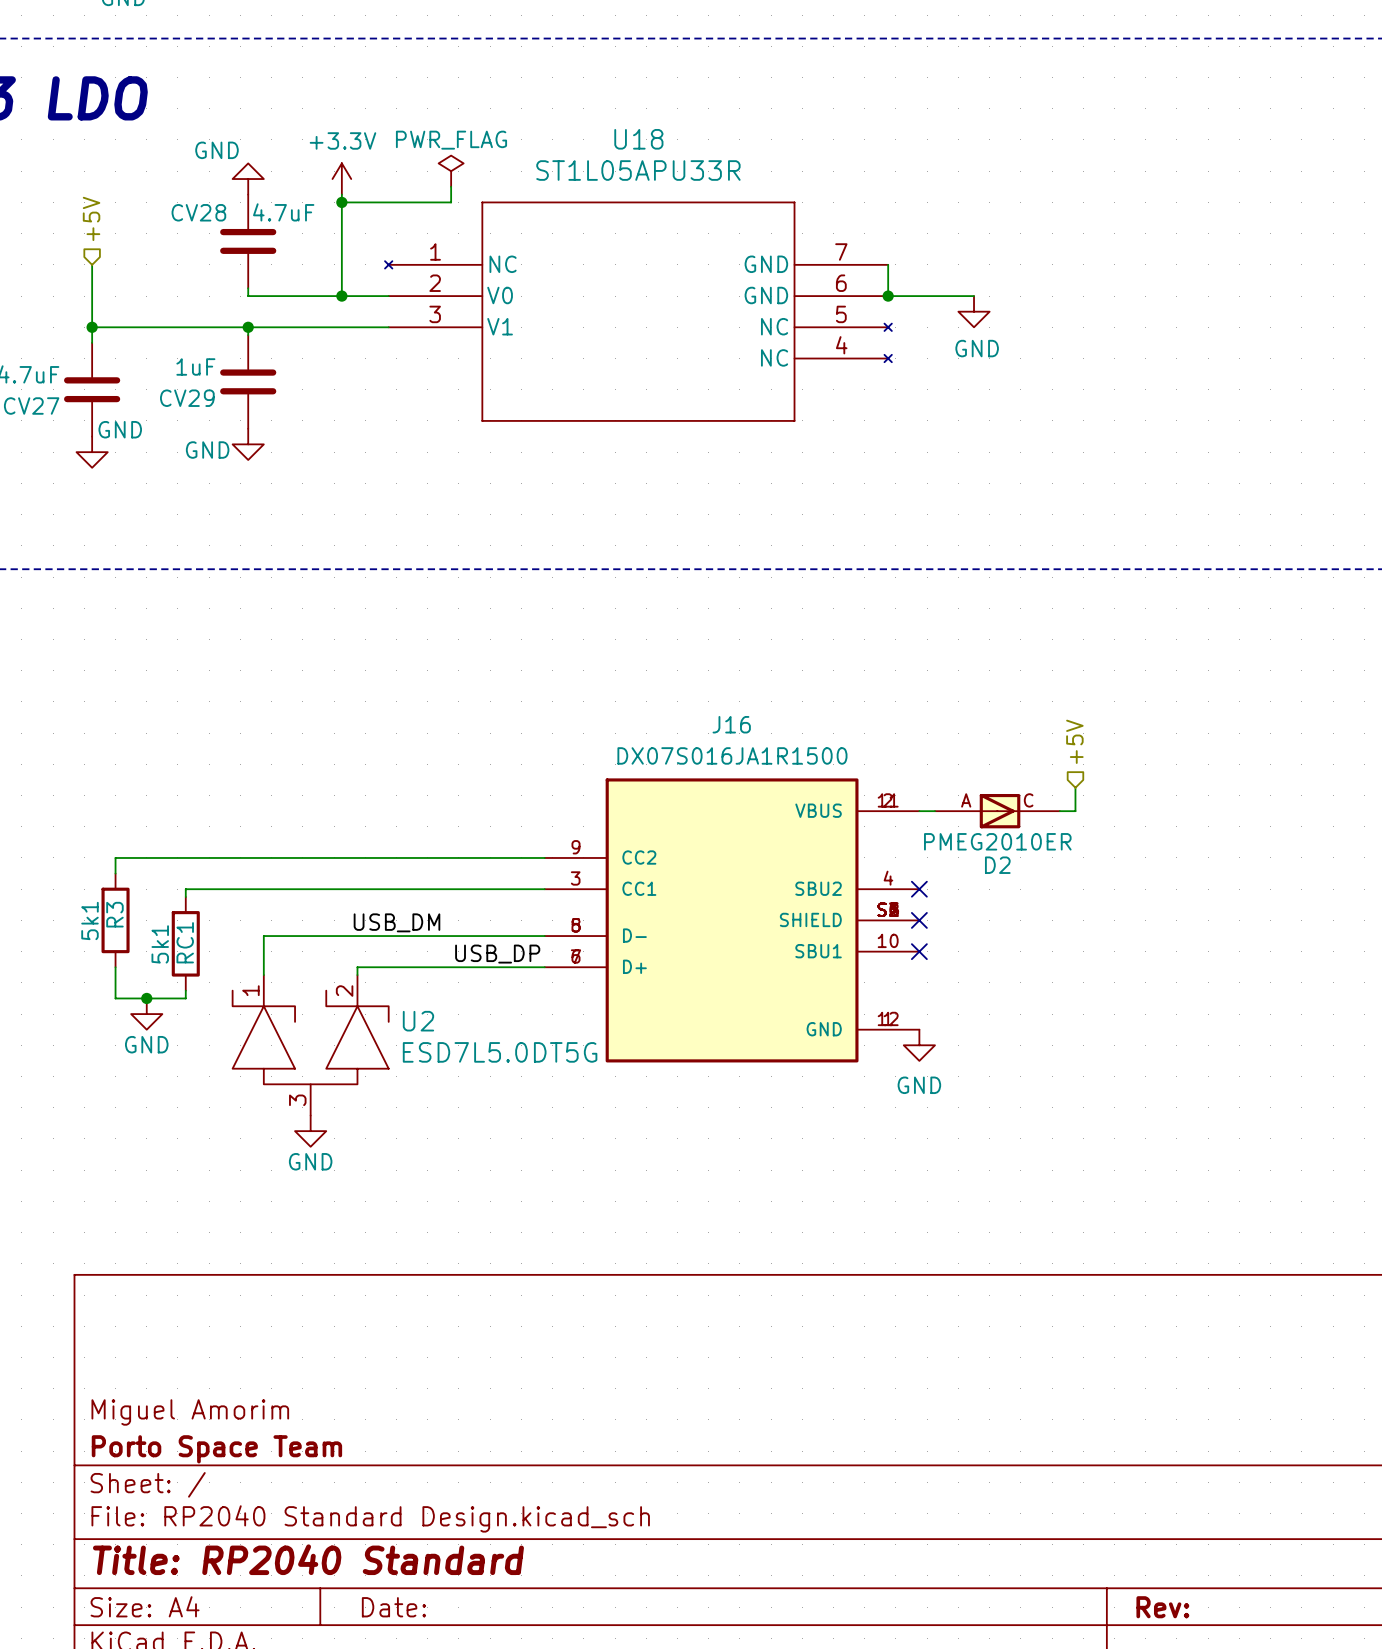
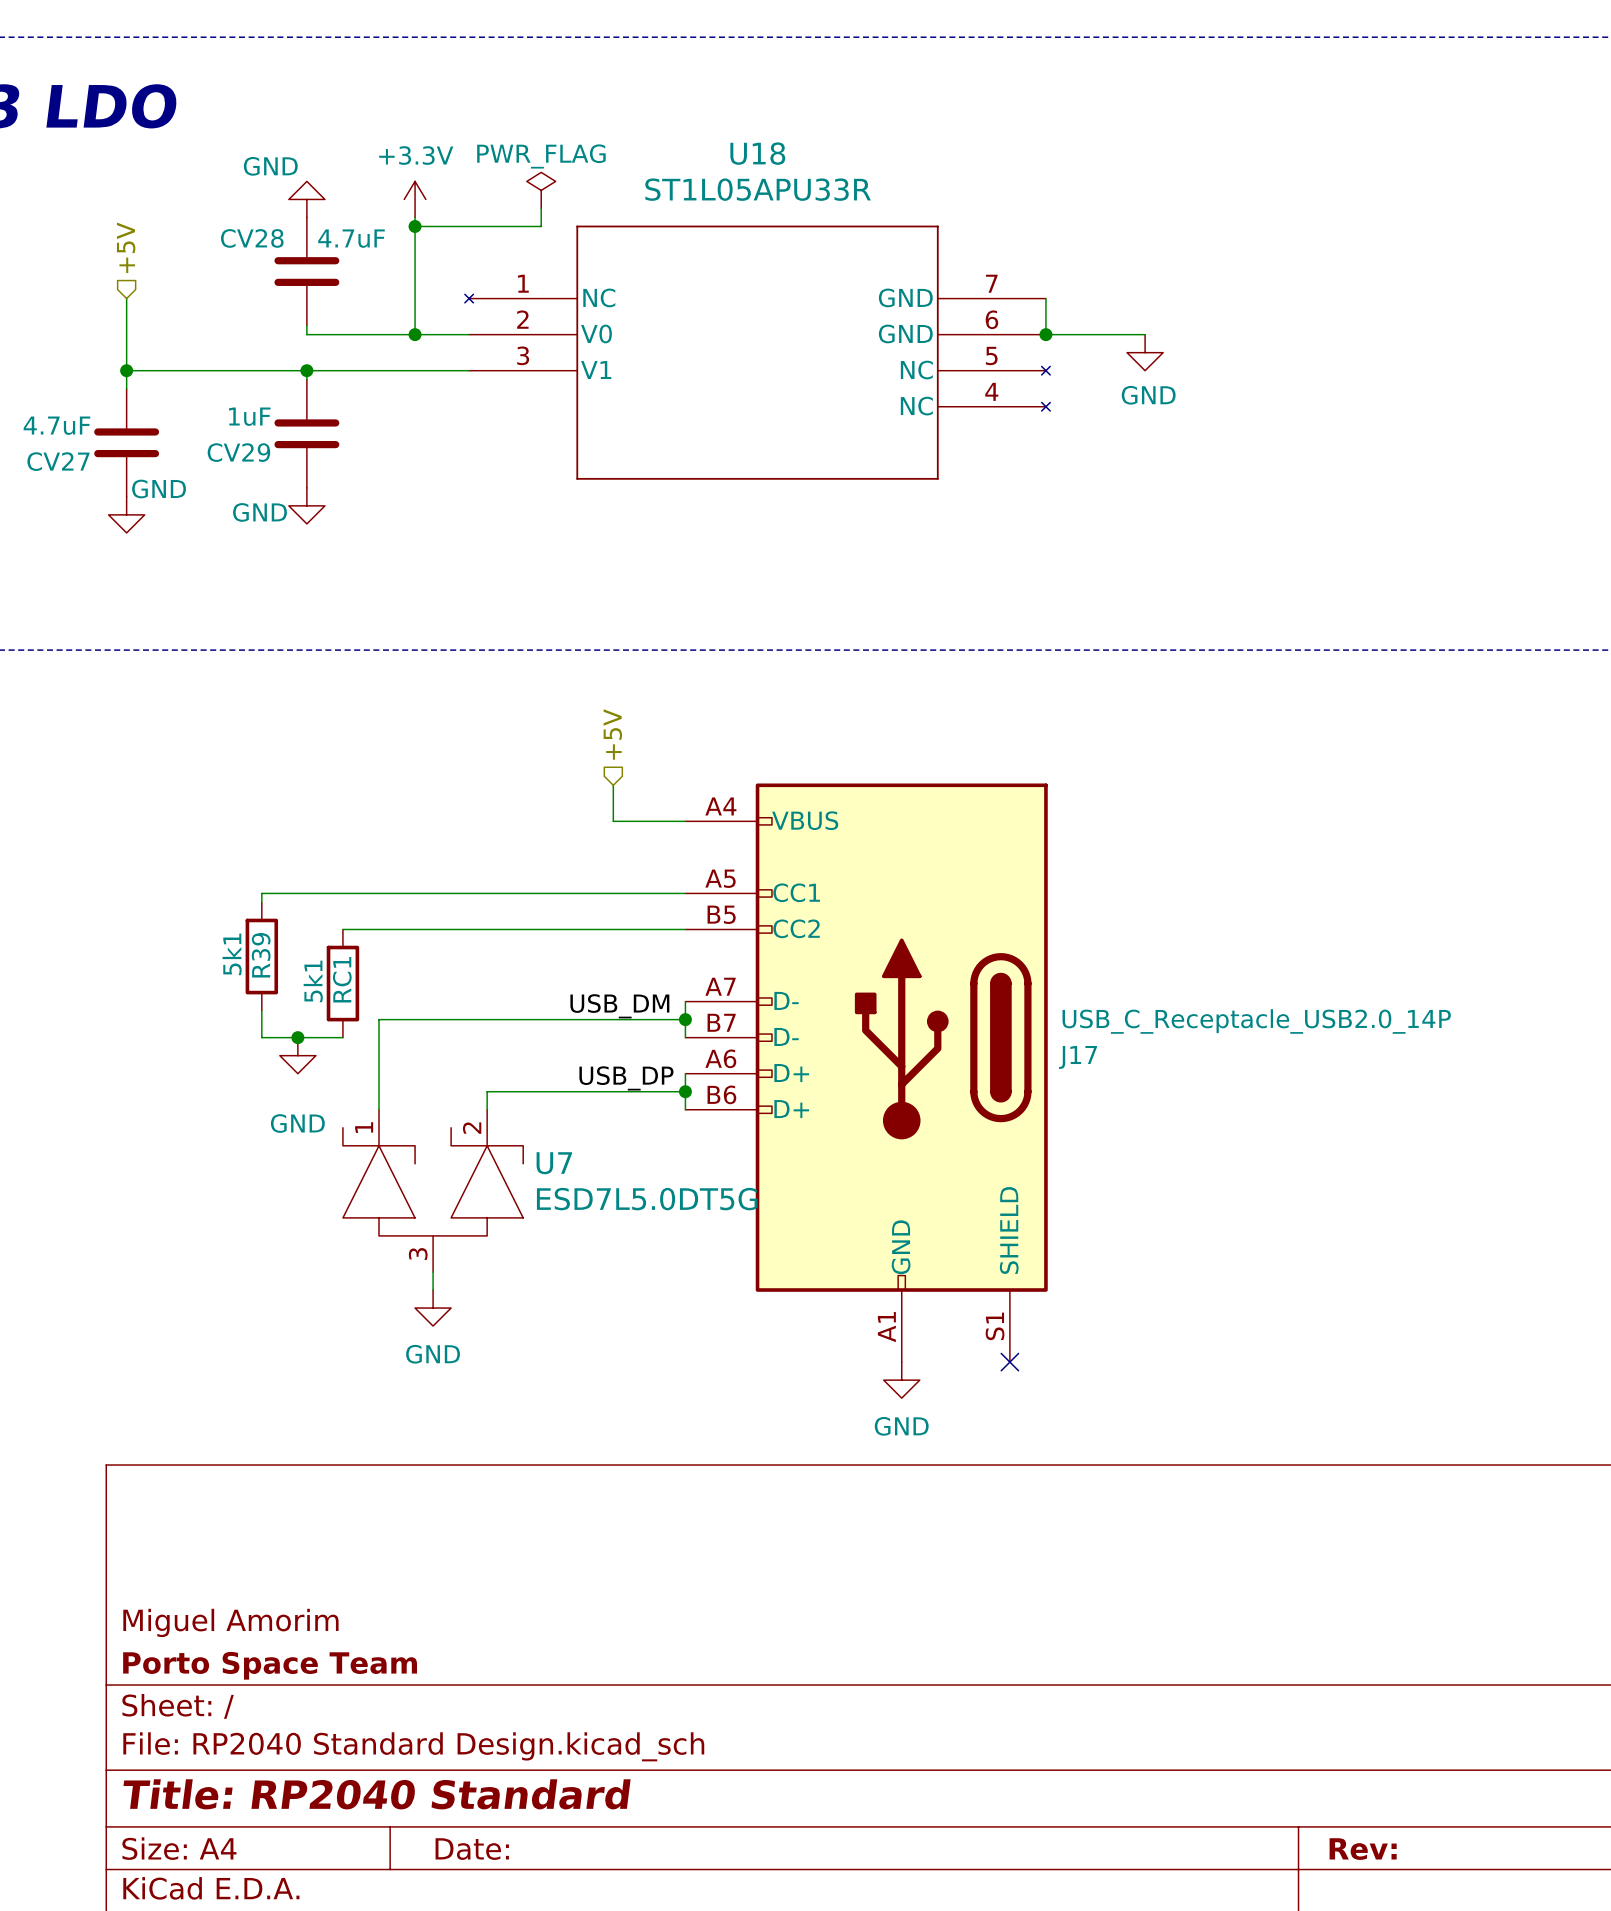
hierarchical label: none -> +5V (612, 734)
wire: none -> (613, 785) (613, 821) (685, 821)
hierarchical label: +5V (1074, 741) -> none
wire: none -> (685, 893) (261, 893) (261, 902)
wire: (1075, 787) (1075, 811) (1059, 811) -> none
wire: none -> (342, 929) (685, 929)
wire: (919, 811) (934, 811) -> none
D2: PMEG2010ER (997, 811) -> none
R39: none -> 5k1 (261, 956)
wire: (544, 857) (115, 857) (115, 873) -> none
wire: none -> (685, 1001) (685, 1037)
wire: none -> (261, 1010) (261, 1037) (342, 1037)
wire: (310, 889) (185, 889) (185, 897) -> (378, 1019) (378, 1109)
junction: none -> (685, 1019)
no-connect mark: (919, 889) -> none
junction: none -> (297, 1037)
R3: 5k1 (115, 920) -> none
power symbol: none -> GND (297, 1055)
J16: DX07S016JA1R1500 (732, 920) -> none
no-connect mark: (919, 920) -> none
label position: USB_DM (396, 922) -> USB_DM (619, 1006)
J17: none -> USB_C_Receptacle_USB2.0_14P (866, 1072)
wire: (544, 936) (263, 936) (263, 975) -> none
wire: none -> (685, 1073) (685, 1109)
RC1 position: (185, 943) -> (342, 983)
wire: none -> (685, 1091) (487, 1091) (487, 1109)
junction: none -> (685, 1091)
no-connect mark: (919, 951) -> none
label position: USB_DP (497, 954) -> USB_DP (626, 1078)
wire: (115, 967) (115, 998) (185, 998) (185, 990) -> none
wire: (544, 967) (357, 967) (357, 975) -> none
junction: (146, 998) -> none
power symbol: GND (146, 1014) -> none
U7: none -> ESD7L5.0DT5G (433, 1190)
U2: ESD7L5.0DT5G (310, 1045) -> none
power symbol position: GND (919, 1045) -> GND (901, 1380)
wire: none -> (433, 1271) (433, 1290)
power symbol position: GND (310, 1131) -> GND (433, 1308)
power symbol text position: GND (310, 1161) -> GND (433, 1354)
no-connect mark: none -> (1009, 1362)

